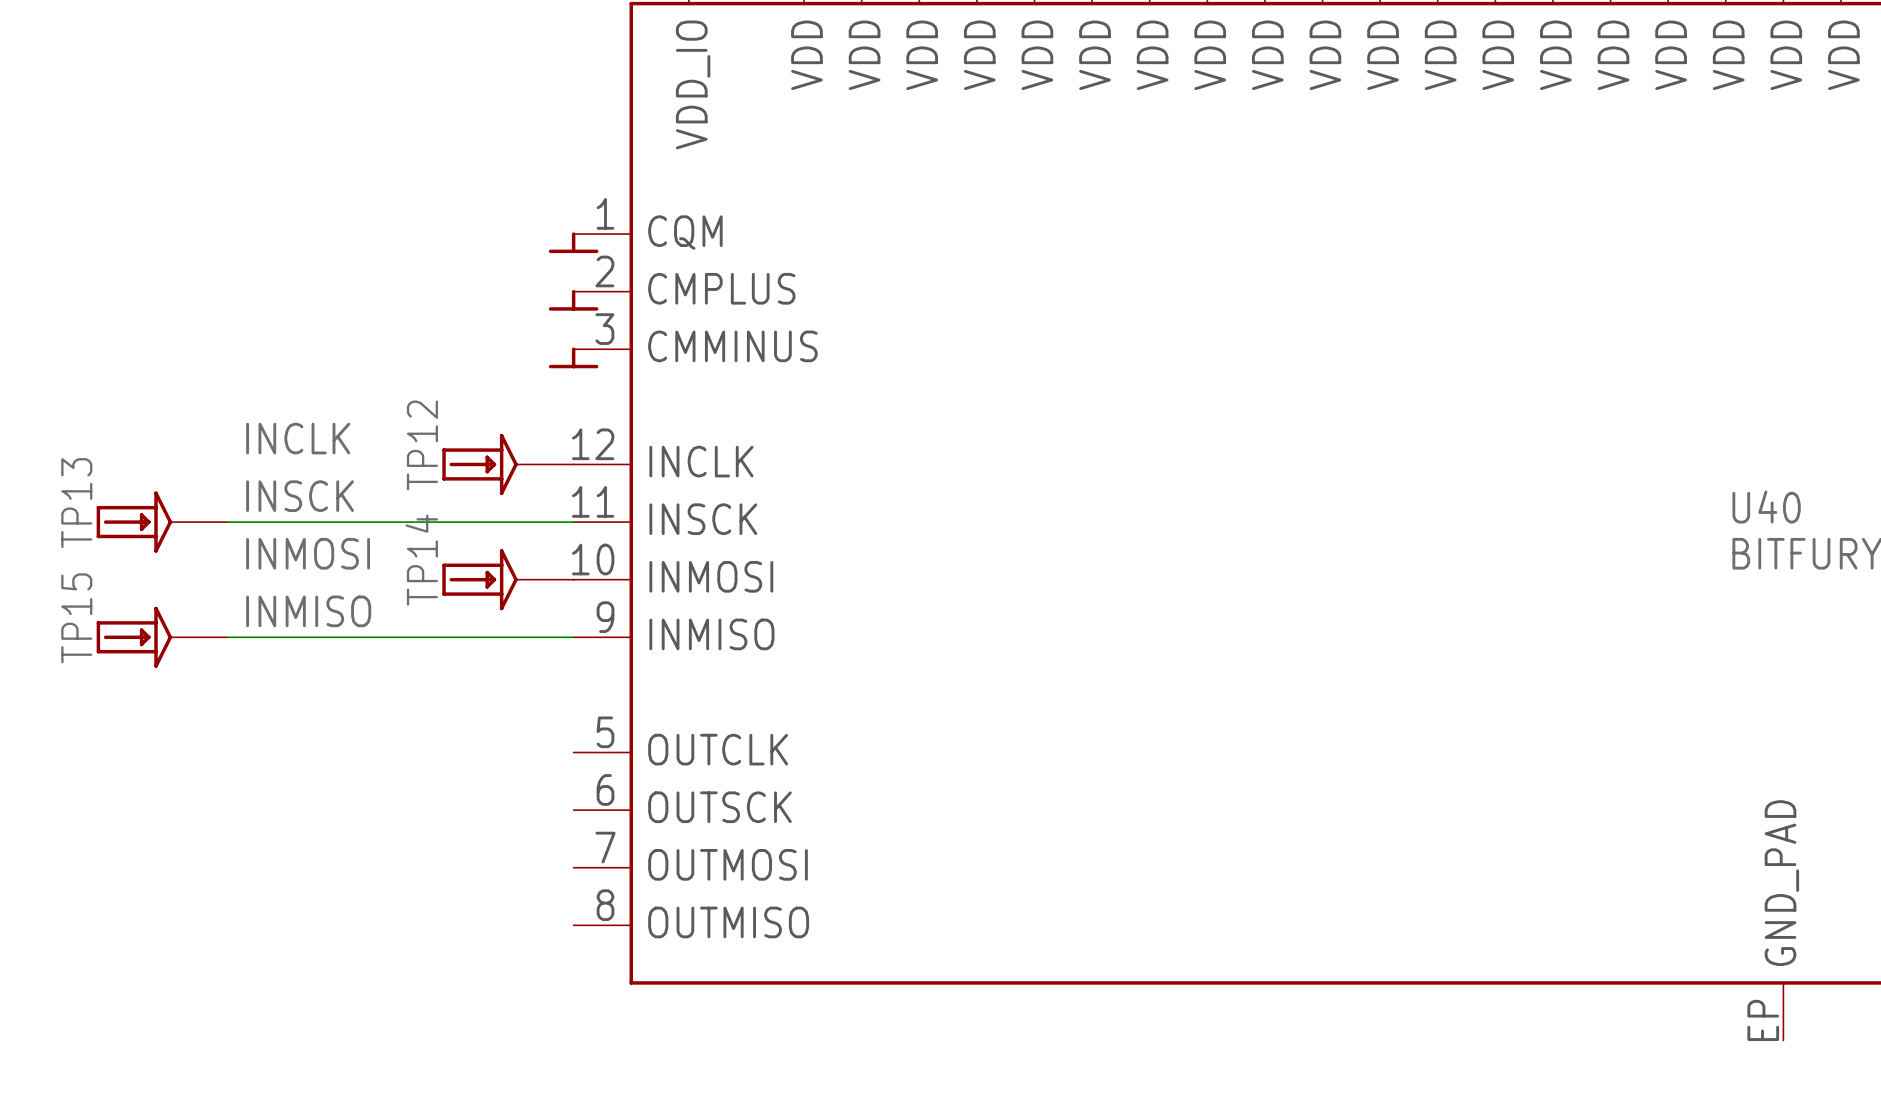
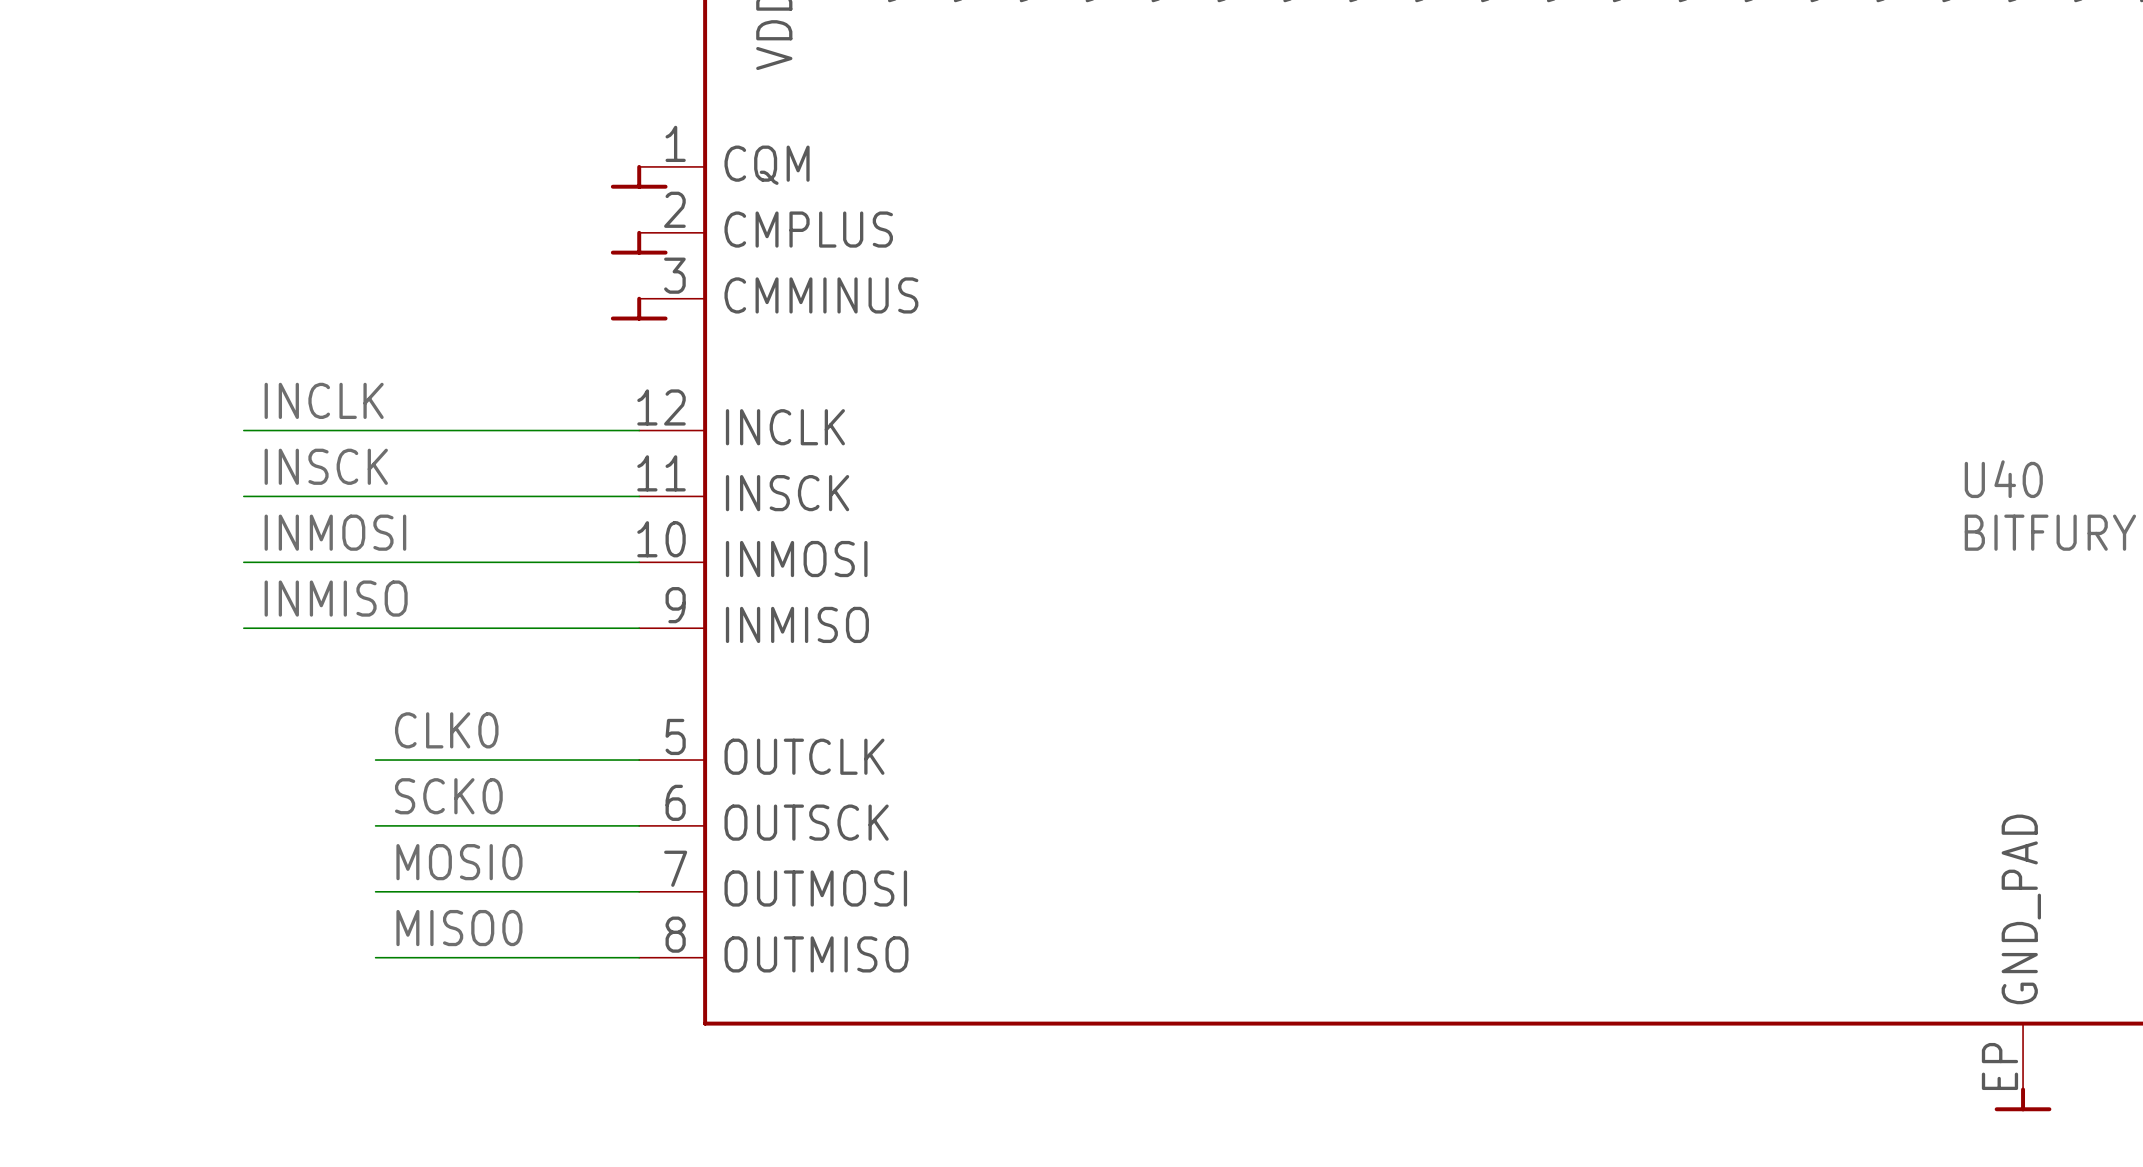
wire: none -> (243, 430) (639, 430)
TP12: (507, 464) -> none
TP13: (162, 522) -> none
wire: none -> (243, 562) (639, 562)
TP14: (507, 579) -> none
TP15: (162, 637) -> none
label: none -> CLK0 (446, 730)
wire: none -> (375, 760) (639, 760)
label: none -> SCK0 (448, 796)
wire: none -> (375, 825) (639, 825)
label: none -> MOSI0 (459, 862)
wire: none -> (375, 891) (639, 891)
label: none -> MISO0 (459, 928)
wire: none -> (375, 957) (639, 957)
power symbol: none -> (2023, 1099)

